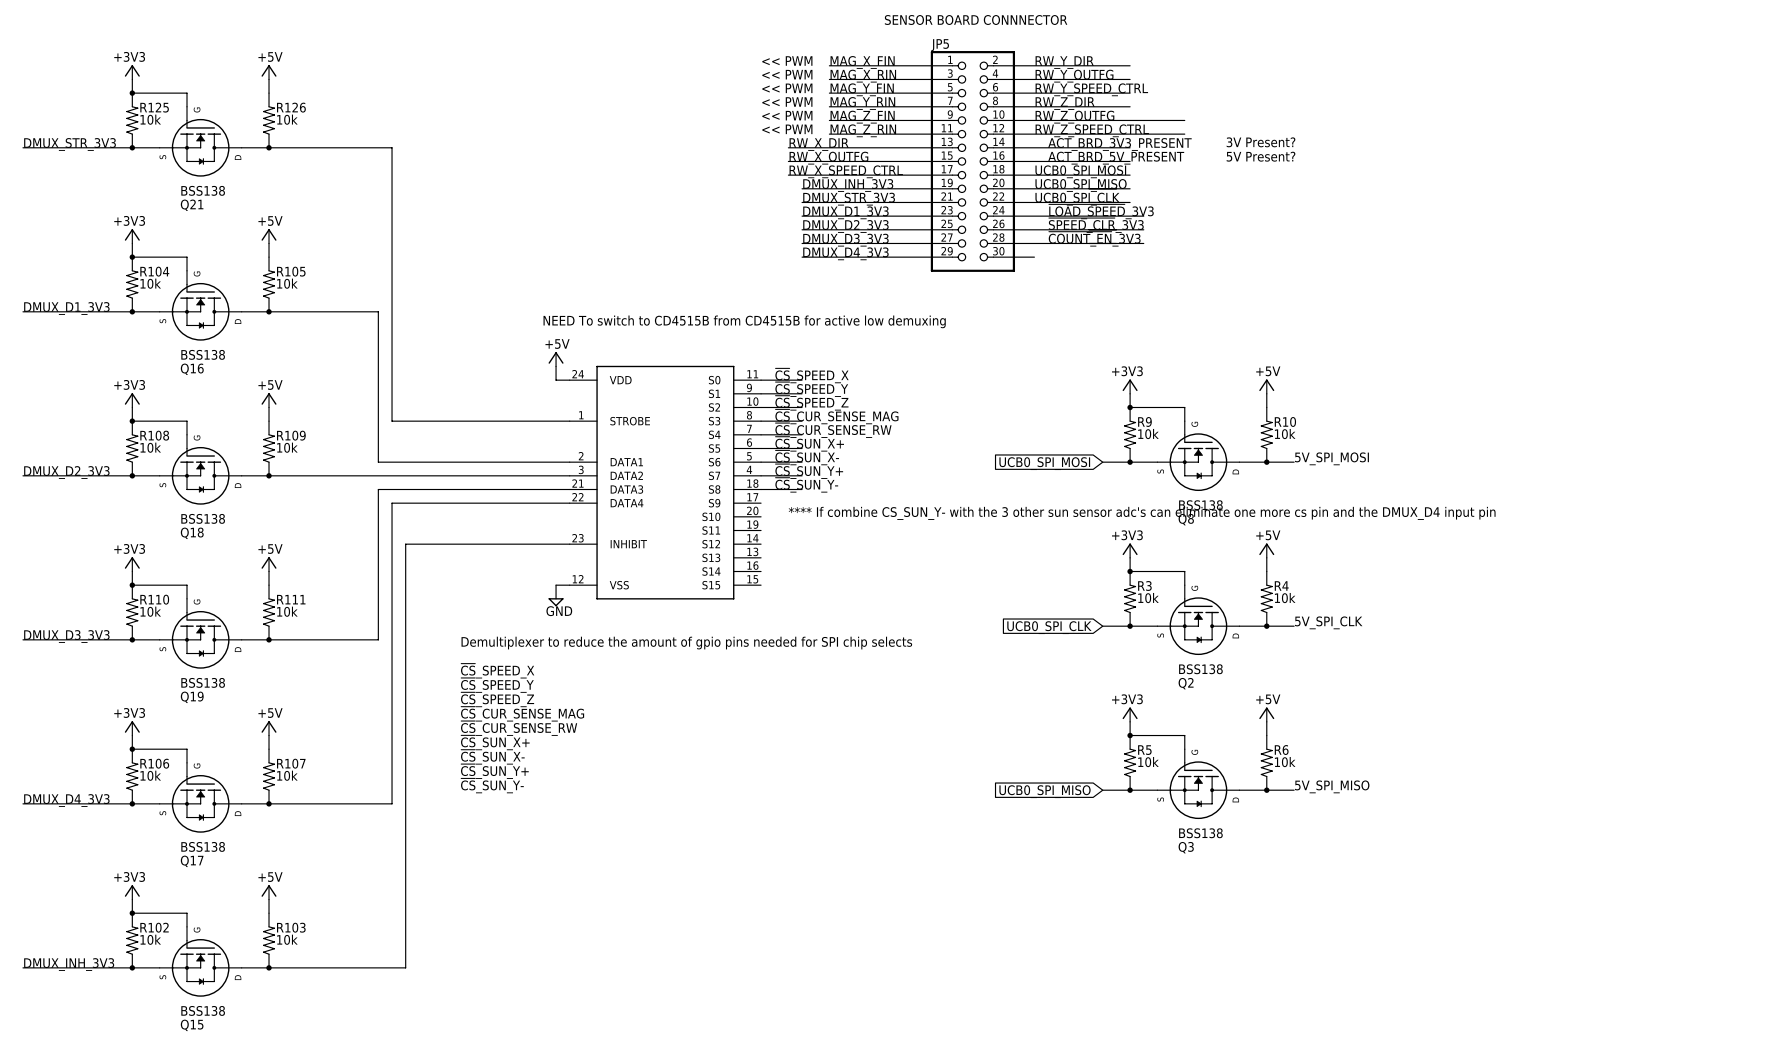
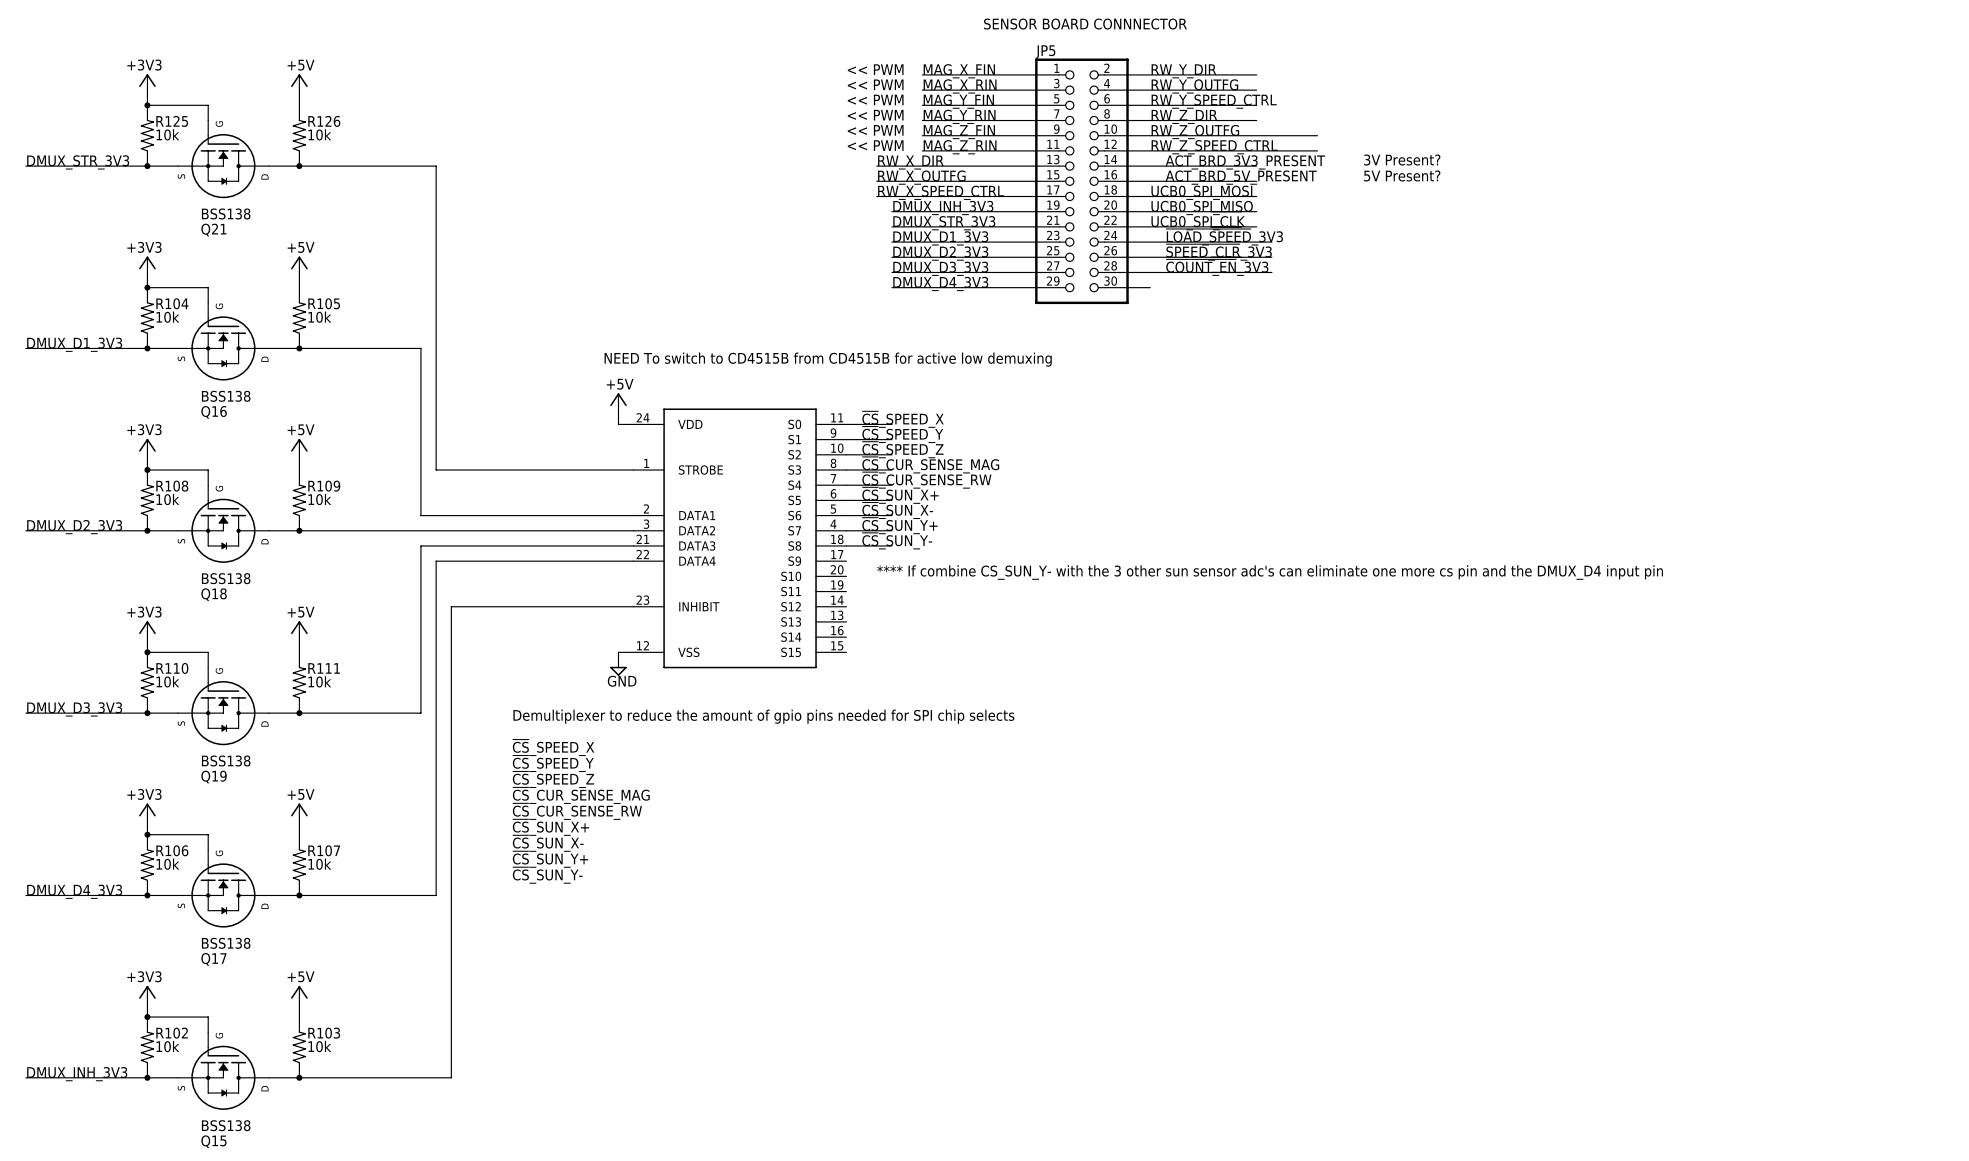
power symbol: +3V3 (1130, 386) -> none
power symbol: +5V (1266, 386) -> none
wire: (1130, 393) (1130, 407) (1184, 407) (1184, 421) -> none
wire: (1266, 393) (1266, 407) -> none
junction: (1130, 407) -> none
R9: 10k (1130, 434) -> none
R10: 10k (1266, 434) -> none
Q8: BSS138 (1198, 456) -> none
label: 5V_SPI_MOSI (1331, 458) -> none
wire: (1102, 462) (1157, 462) -> none
junction: (1130, 462) -> none
wire: (1239, 462) (1294, 462) -> none
junction: (1266, 462) -> none
global label: UCB0_SPI_MOSI (1044, 463) -> none
power symbol: +3V3 (1130, 550) -> none
power symbol: +5V (1266, 550) -> none
wire: (1130, 557) (1130, 571) (1184, 571) (1184, 585) -> none
wire: (1266, 557) (1266, 571) -> none
junction: (1130, 571) -> none
R3: 10k (1130, 598) -> none
R4: 10k (1266, 598) -> none
Q2: BSS138 (1198, 620) -> none
label: 5V_SPI_CLK (1328, 622) -> none
wire: (1102, 626) (1157, 626) -> none
junction: (1130, 626) -> none
wire: (1239, 626) (1294, 626) -> none
junction: (1266, 626) -> none
global label: UCB0_SPI_CLK (1049, 627) -> none
power symbol: +3V3 (1130, 714) -> none
power symbol: +5V (1266, 714) -> none
wire: (1130, 721) (1130, 735) (1184, 735) (1184, 749) -> none
wire: (1266, 721) (1266, 735) -> none
junction: (1130, 735) -> none
R5: 10k (1130, 762) -> none
R6: 10k (1266, 762) -> none
Q3: BSS138 (1198, 784) -> none
label: 5V_SPI_MISO (1332, 786) -> none
wire: (1102, 790) (1157, 790) -> none
junction: (1130, 790) -> none
wire: (1239, 790) (1294, 790) -> none
junction: (1266, 790) -> none
global label: UCB0_SPI_MISO (1045, 791) -> none

